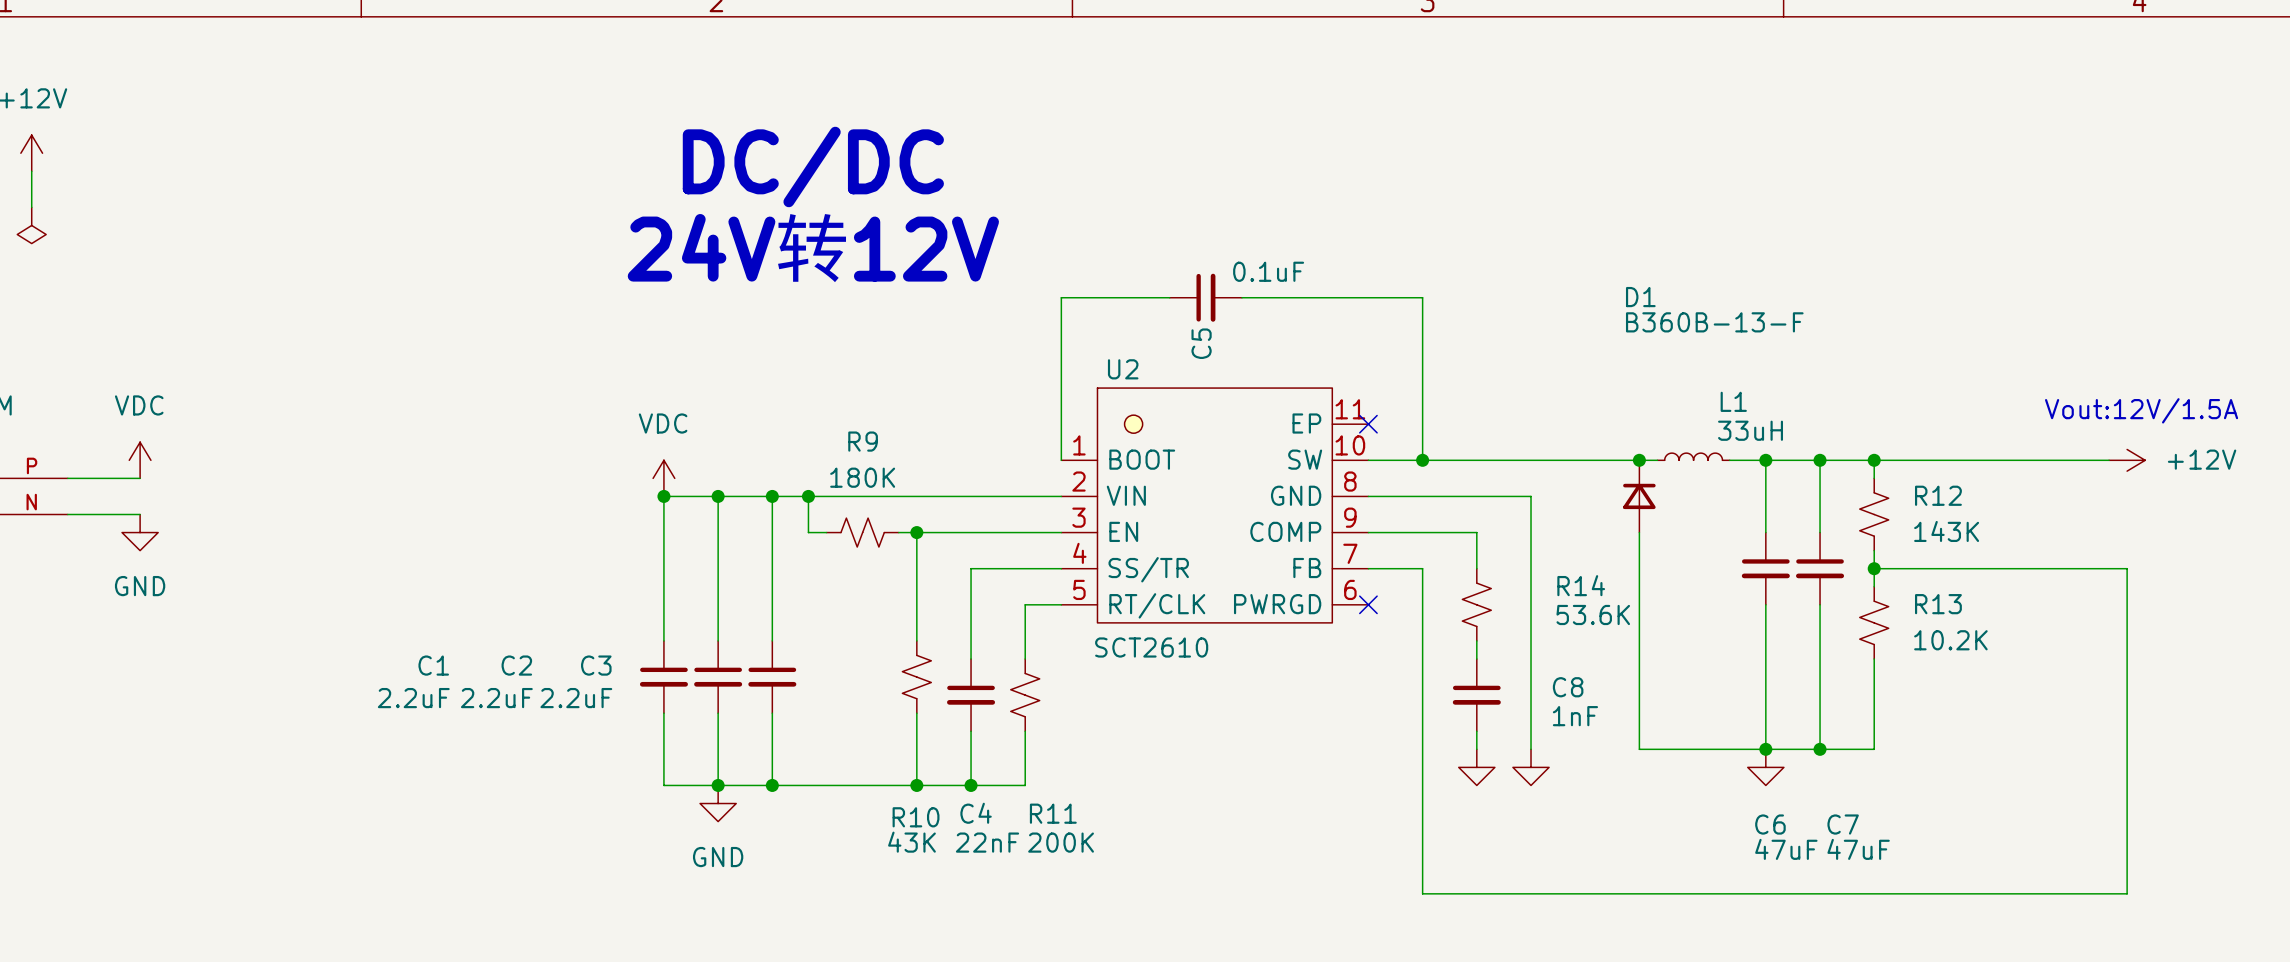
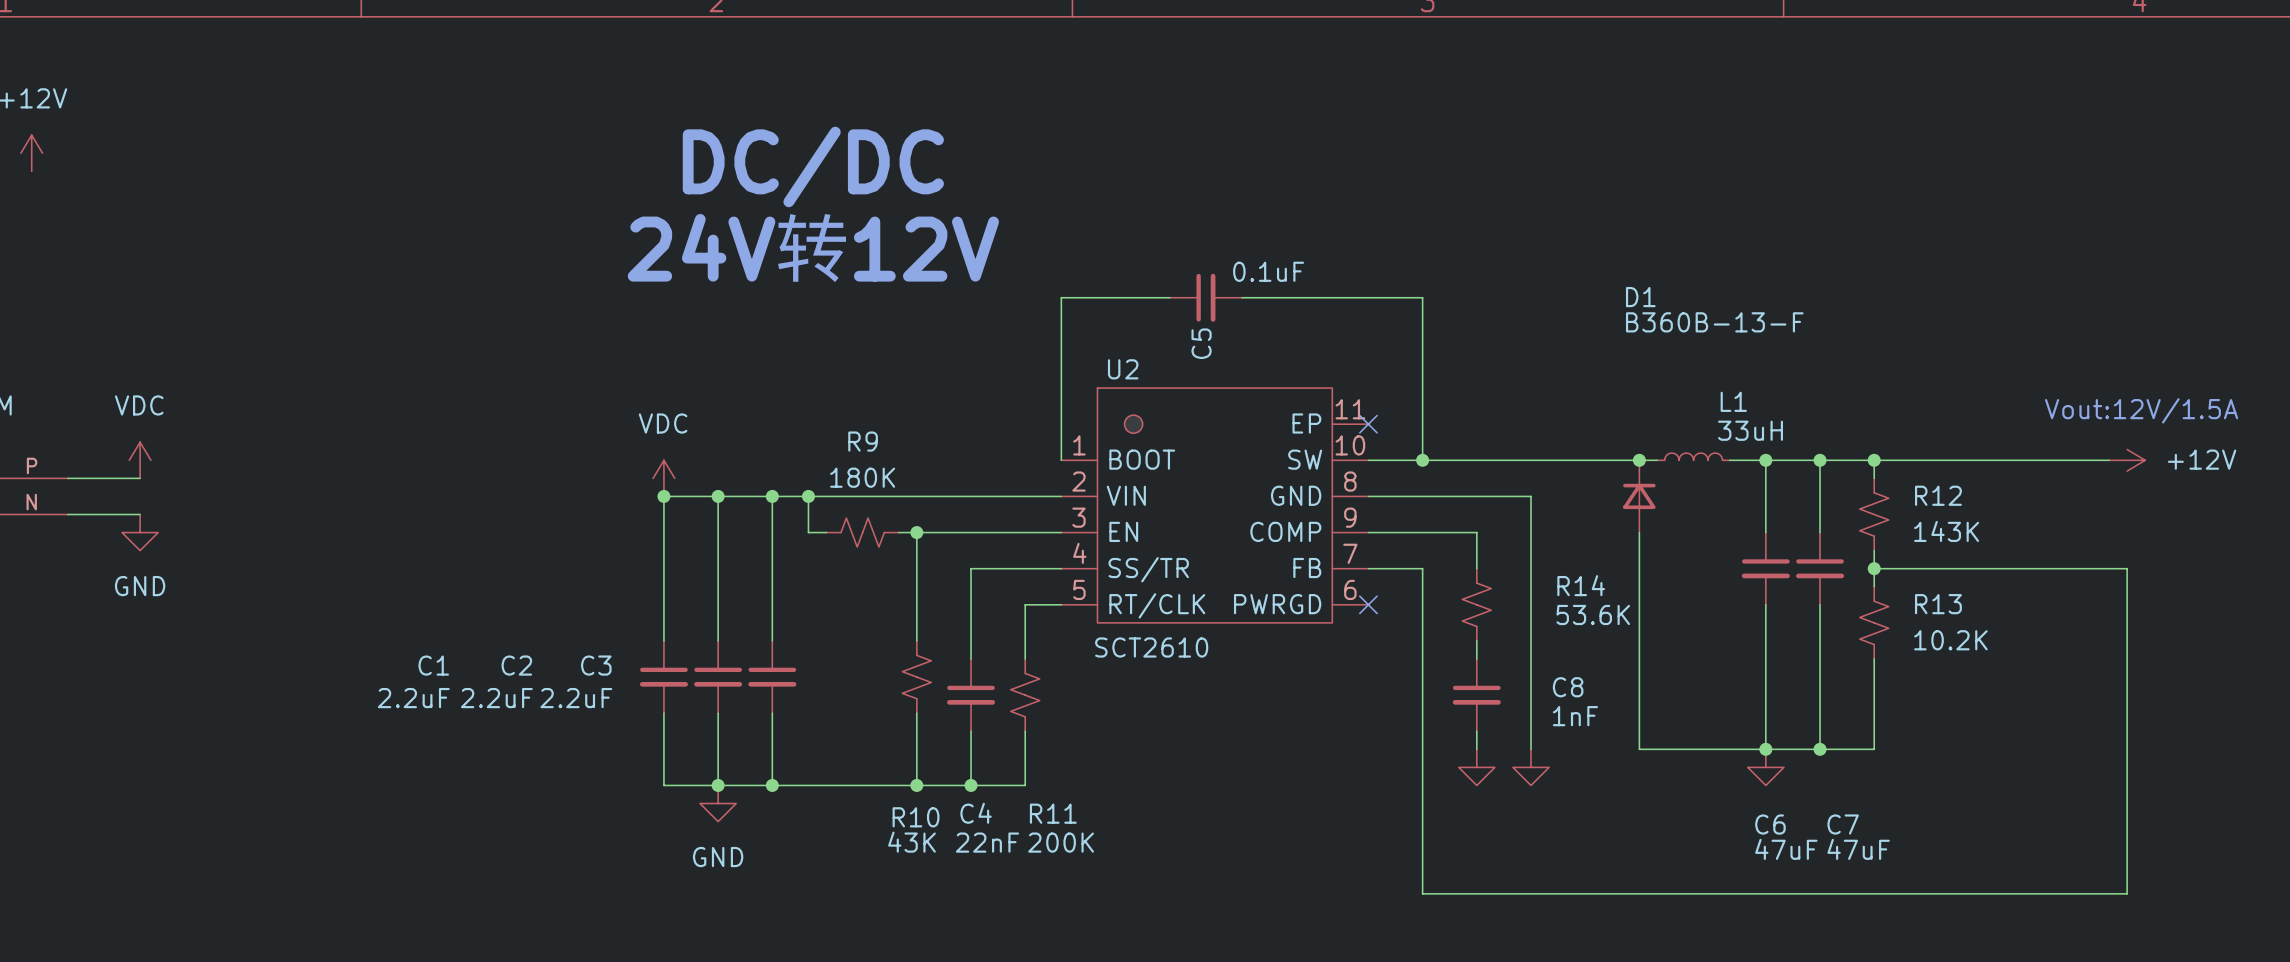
wire: (31, 171) (31, 207) -> none
power symbol: (31, 225) -> none

